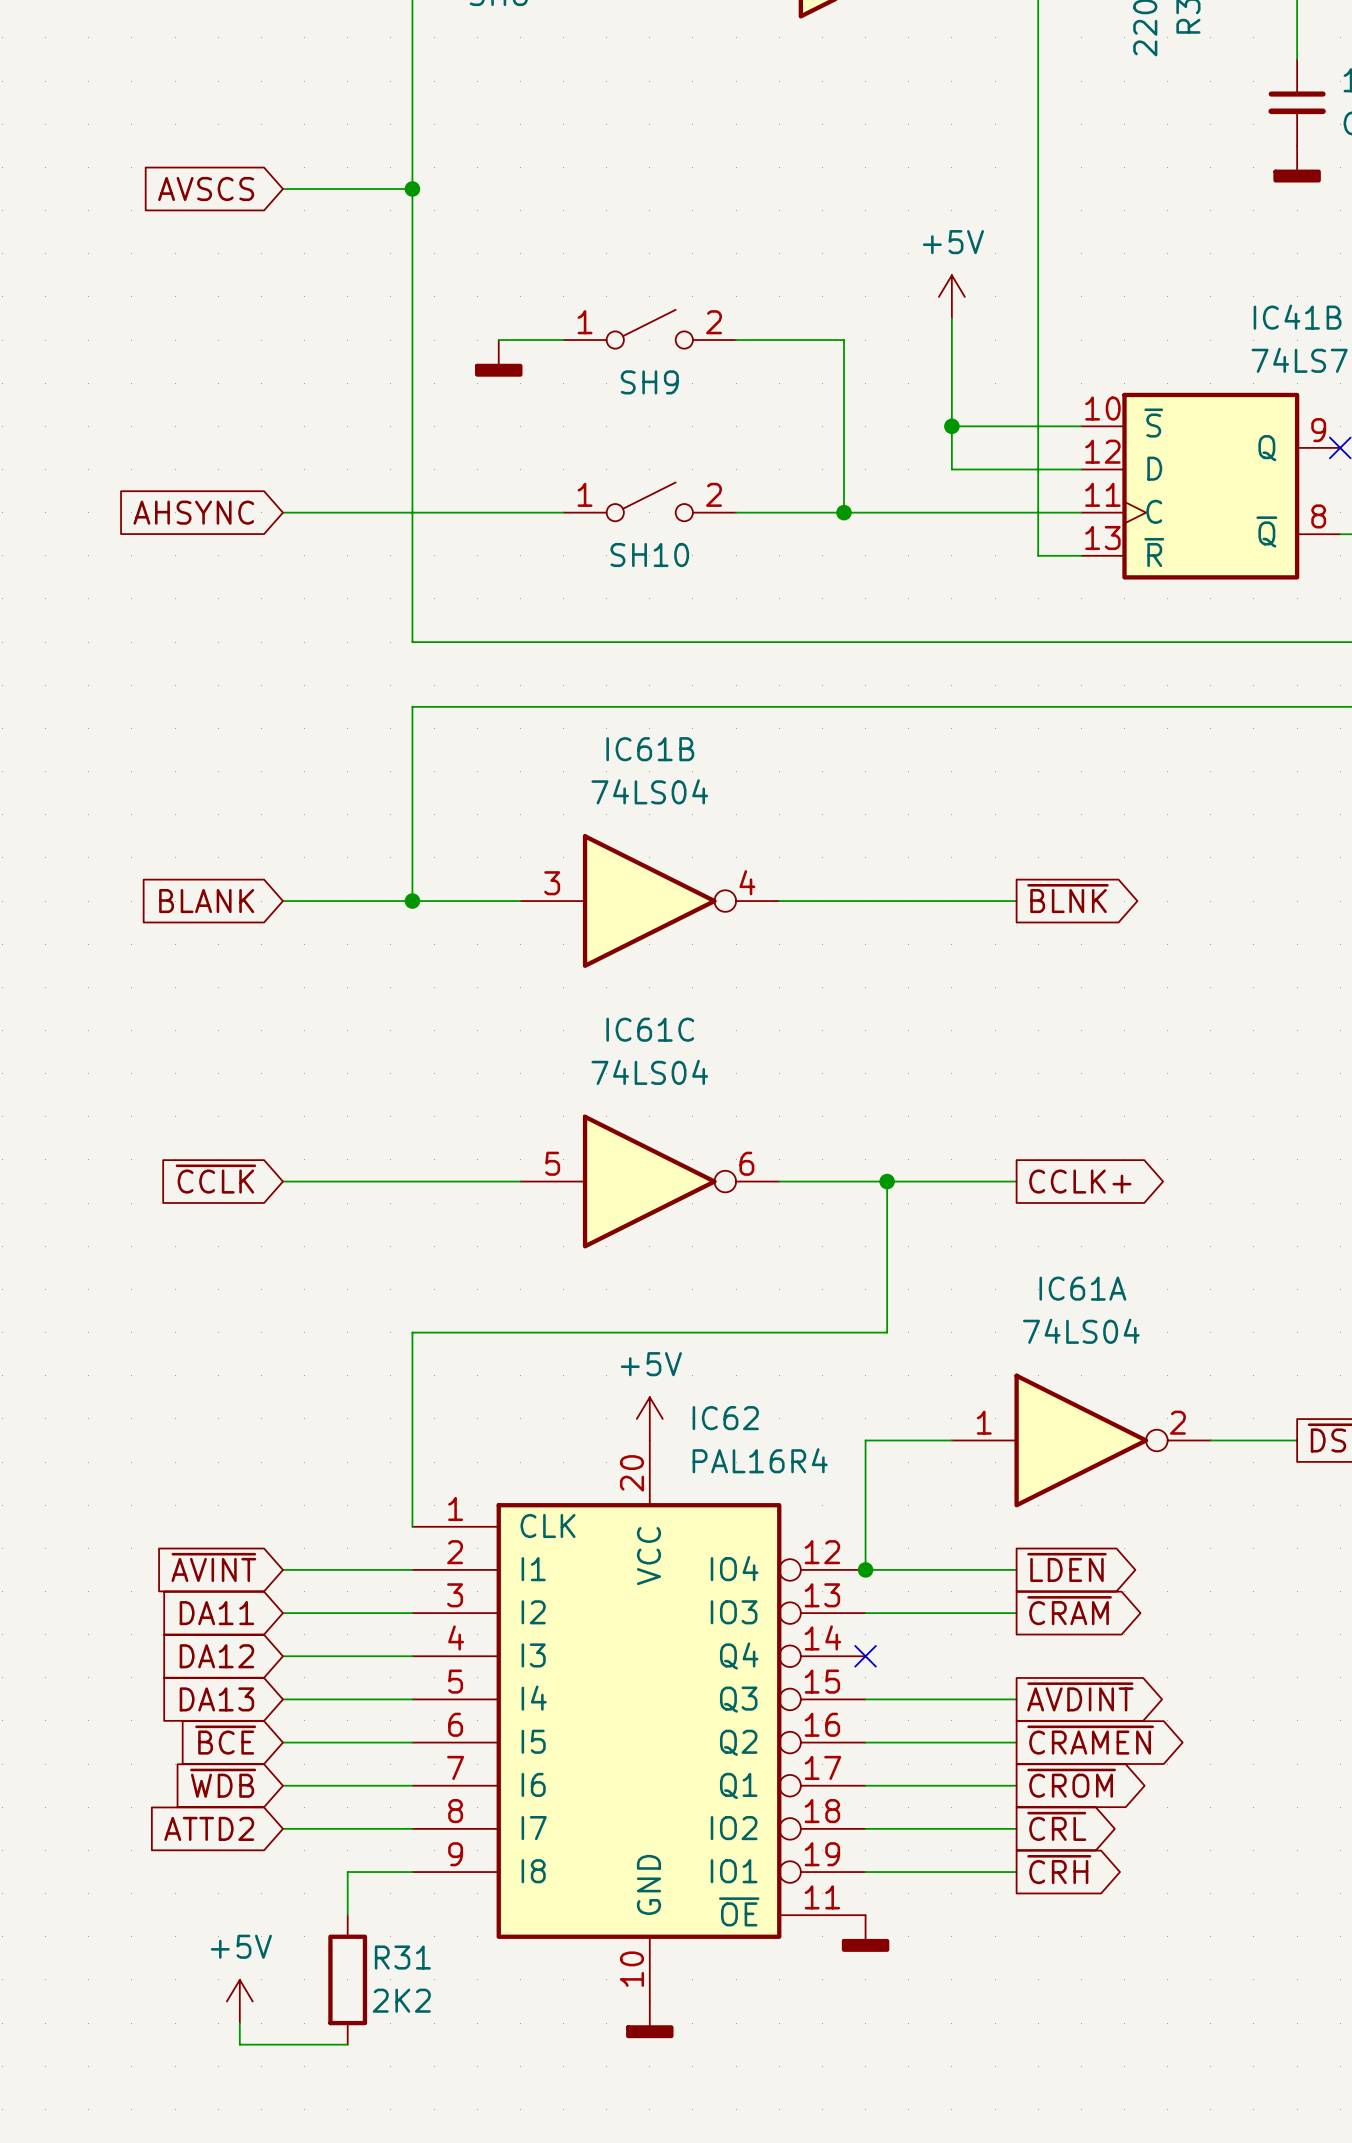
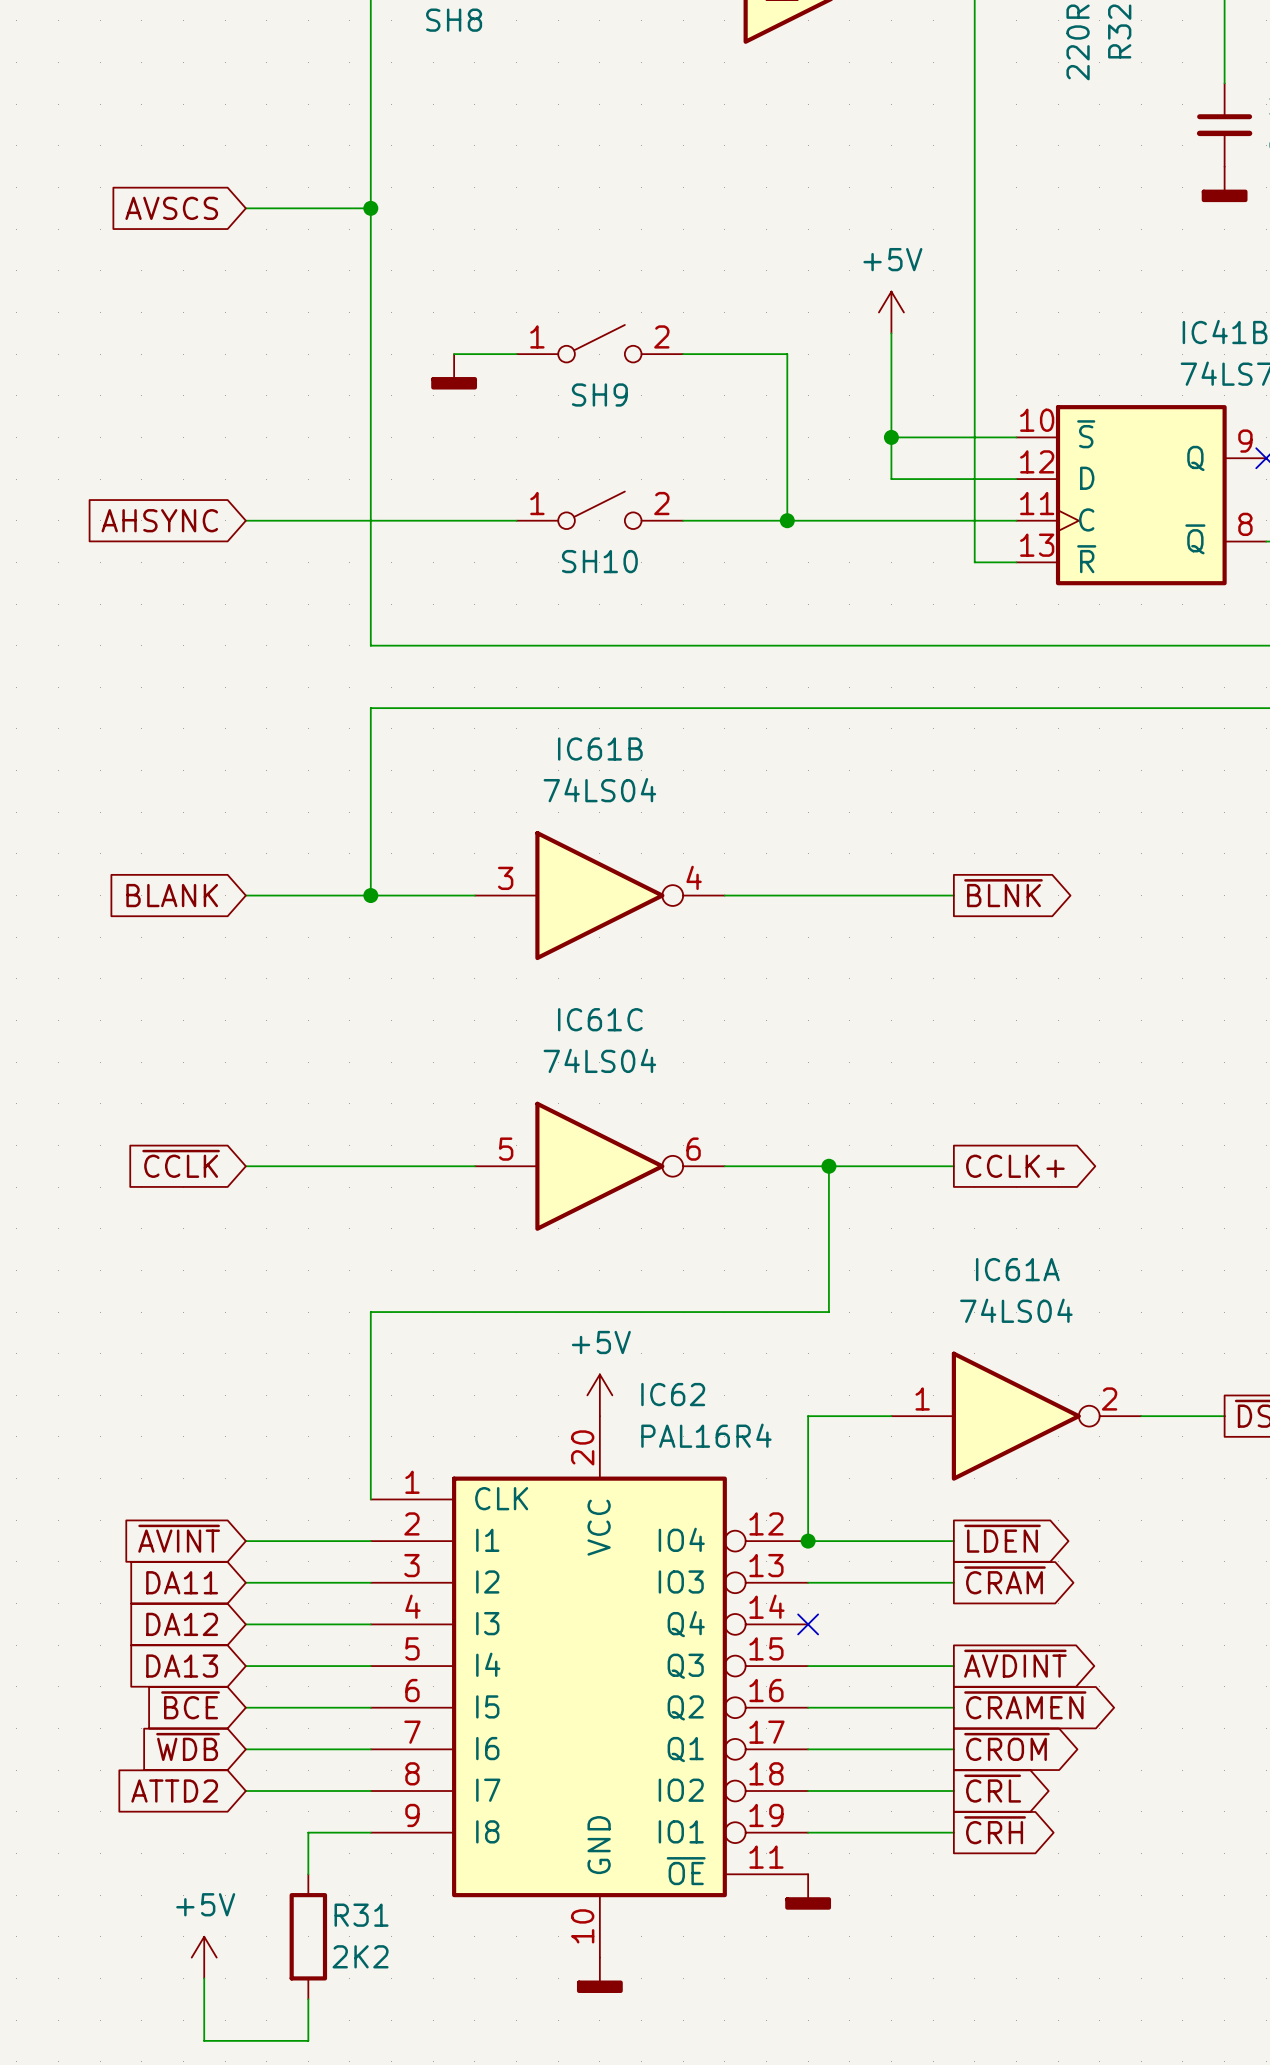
wire: (239, 2044) (347, 2044) -> (204, 1999) (204, 2040) (308, 2040) (308, 1999)

